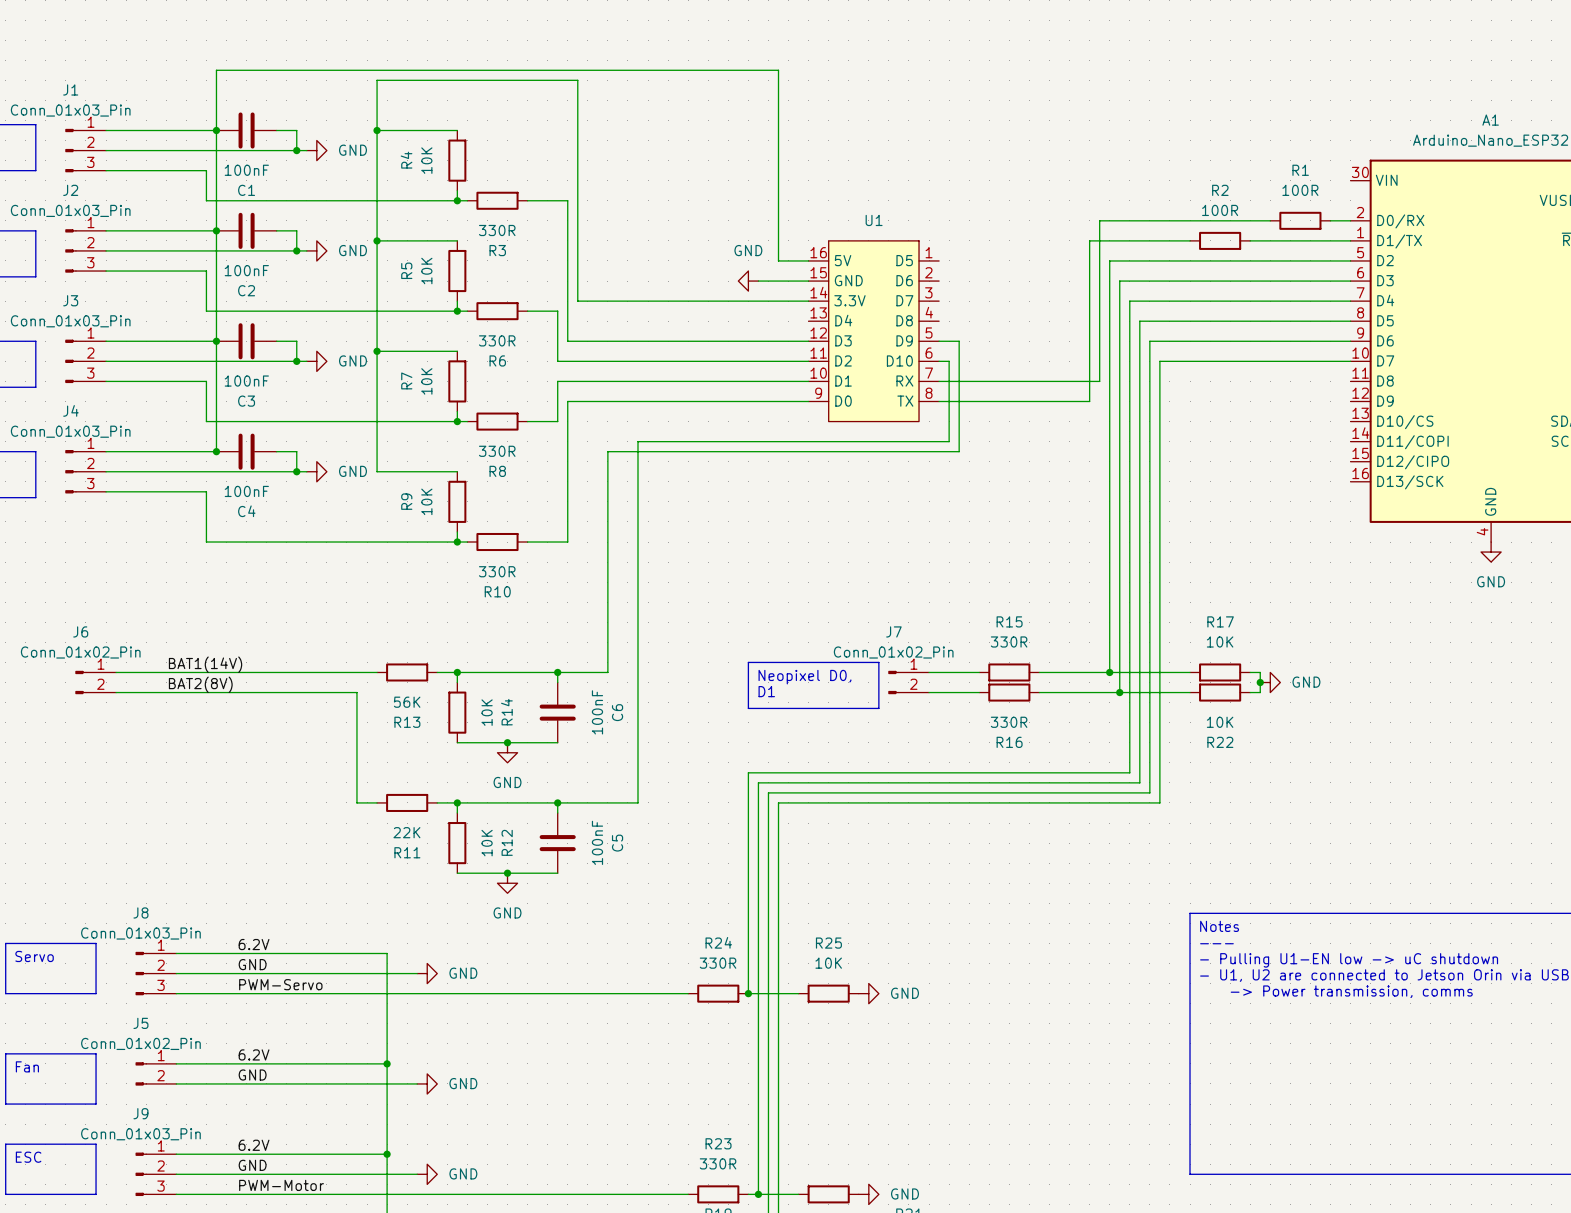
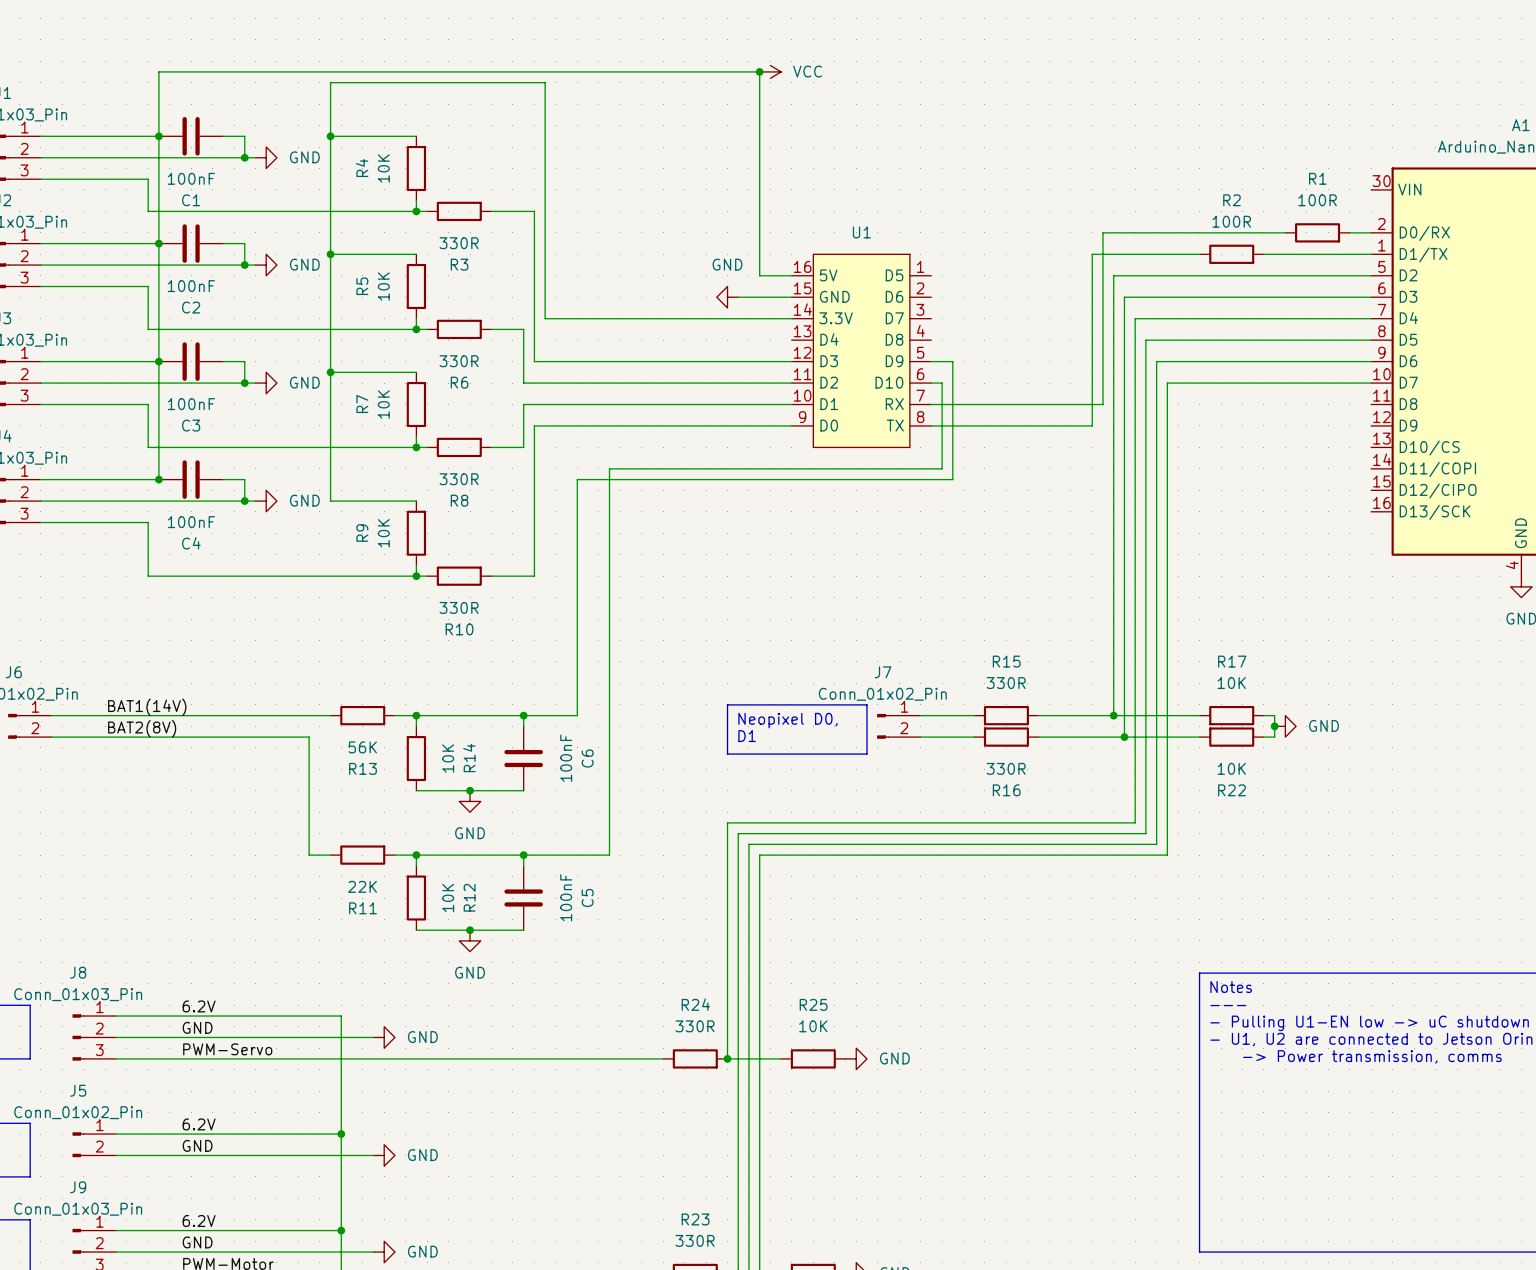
junction: none -> (759, 71)
power symbol: none -> VCC (770, 71)

